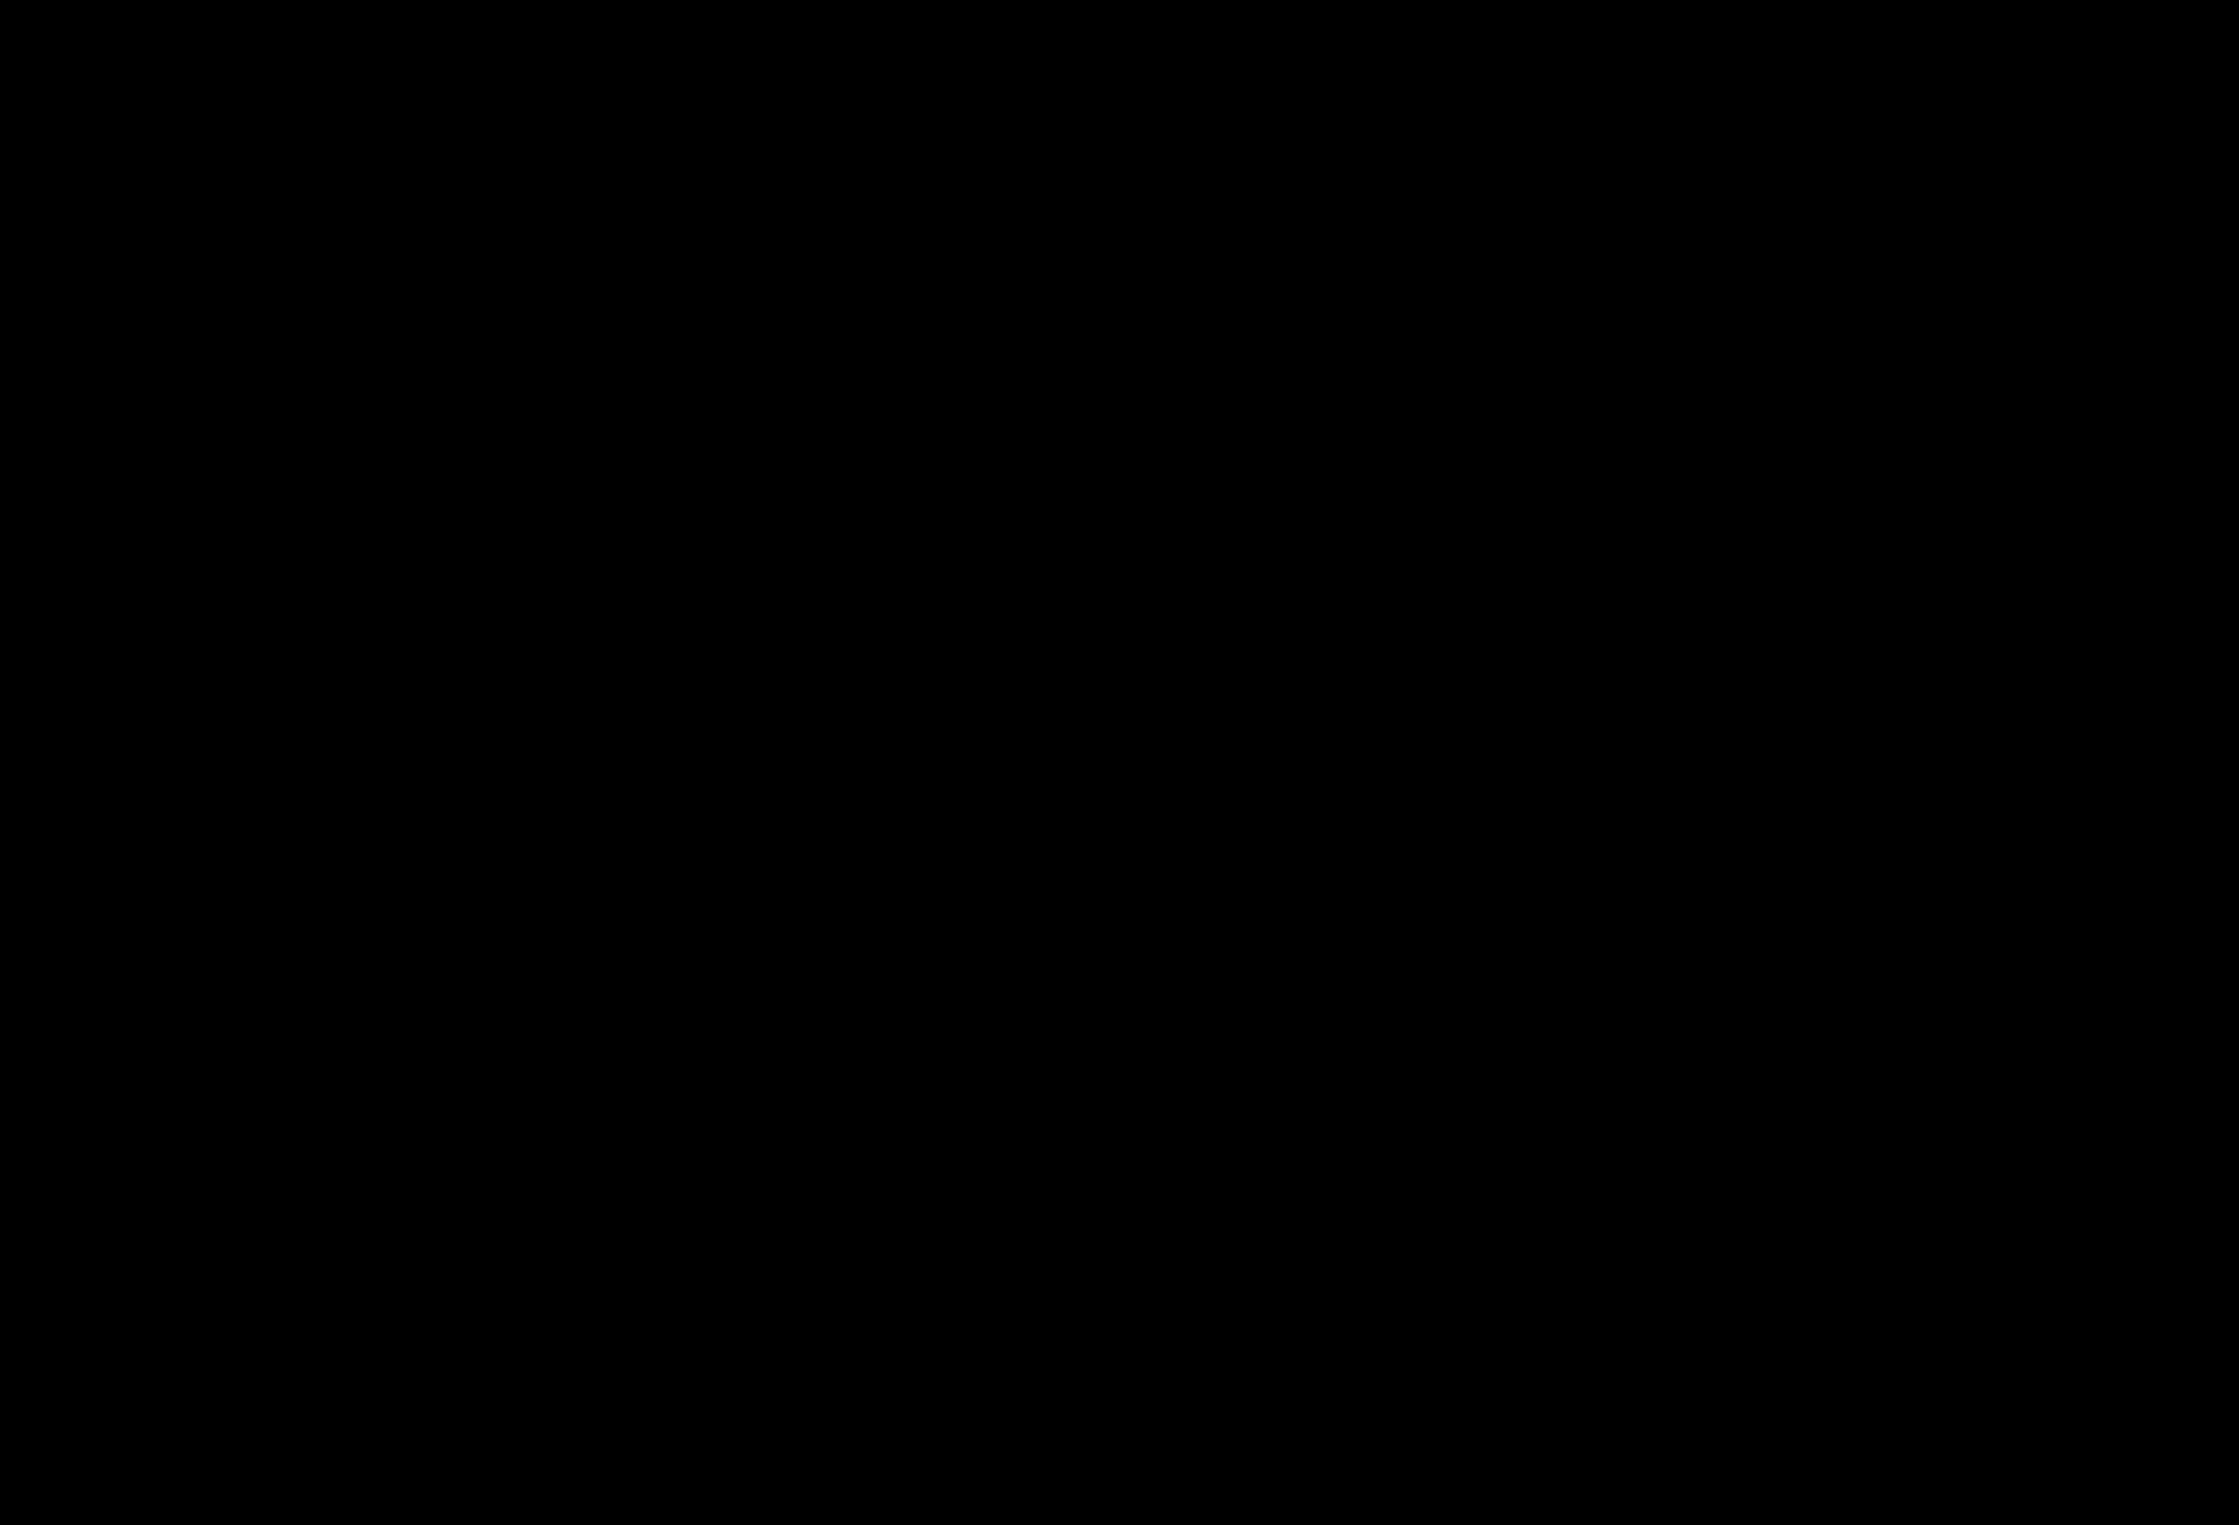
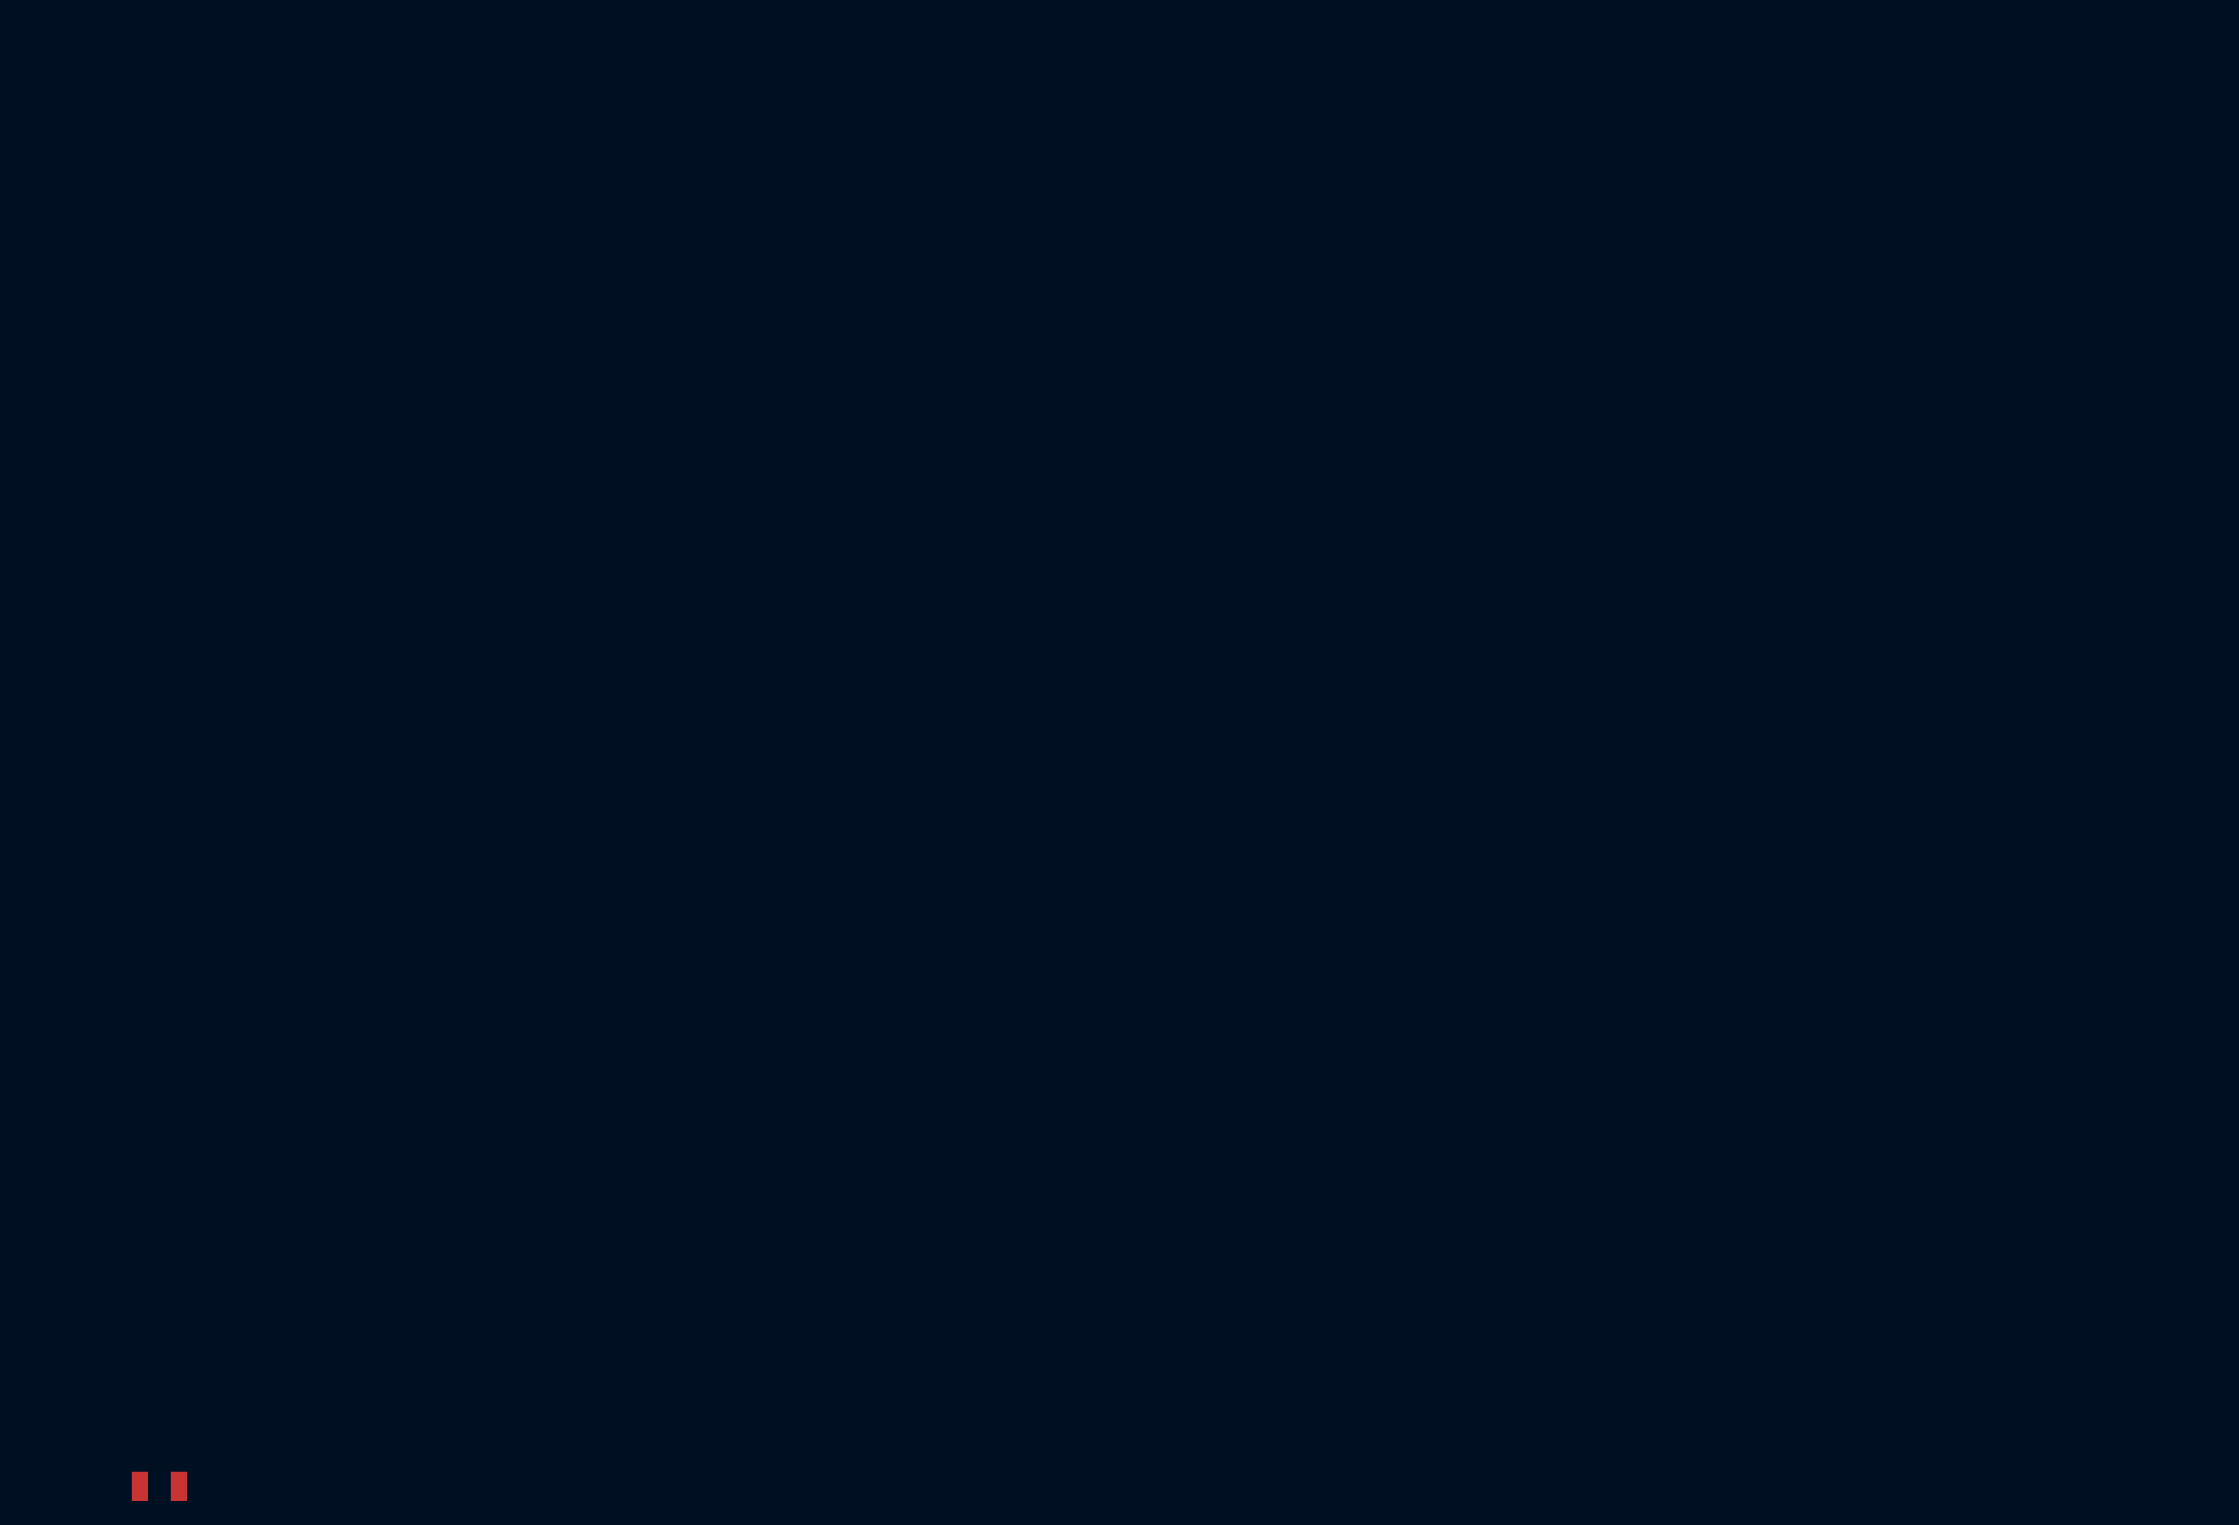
part: none -> (159, 1486)

